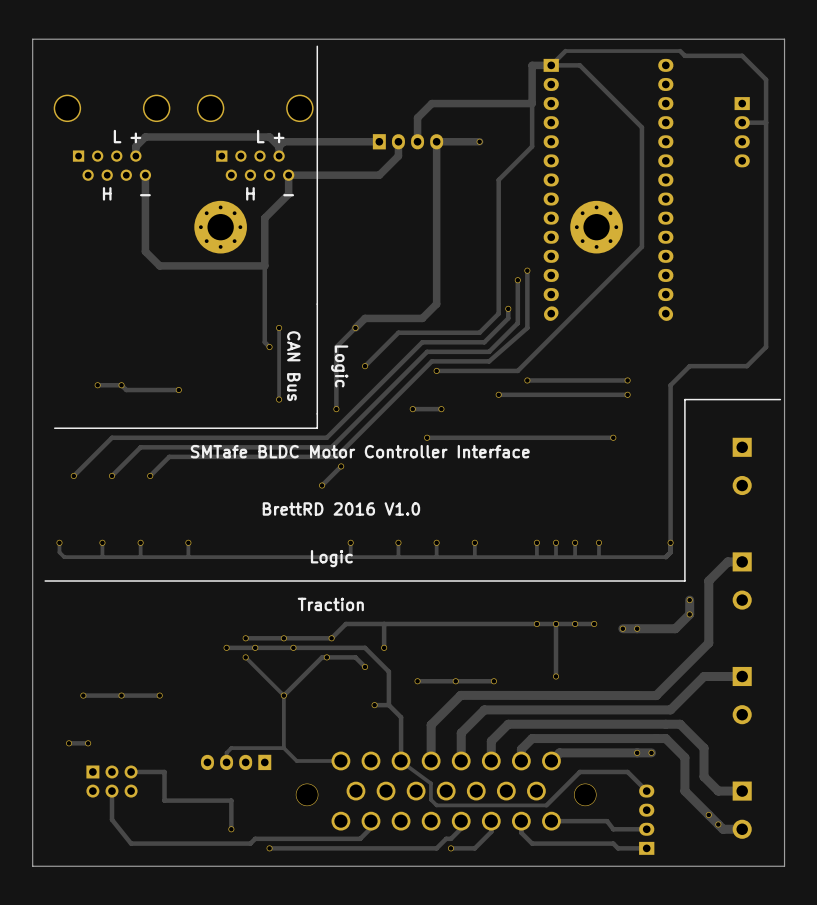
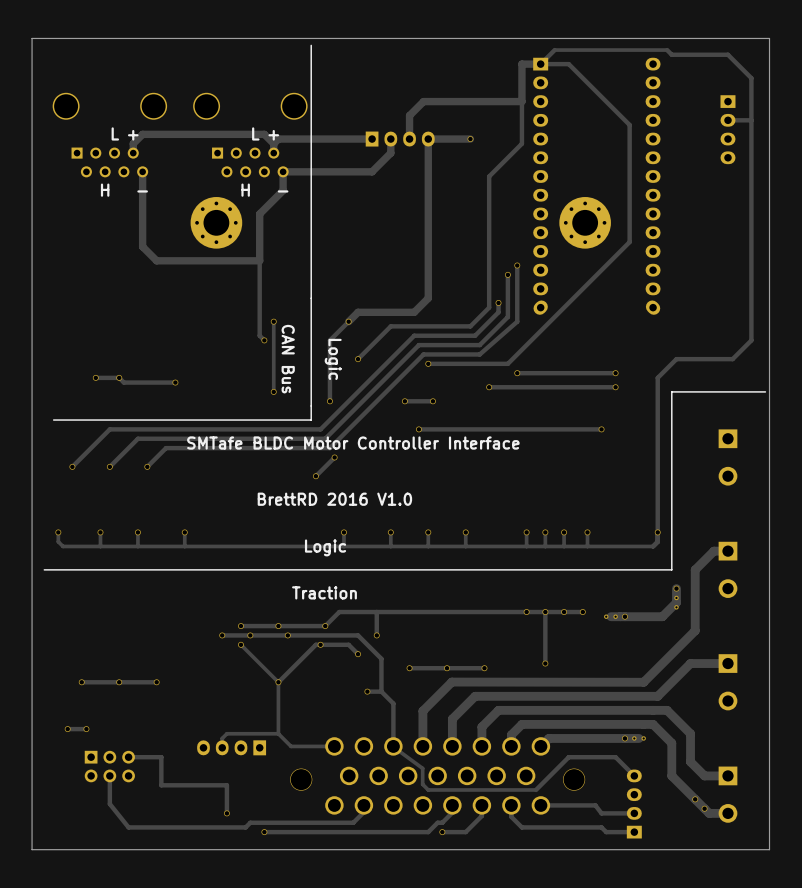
via: none -> (676, 597)
via: (689, 614) -> none
via: none -> (676, 607)
via: none -> (606, 616)
via: (622, 628) -> none
via: none -> (615, 616)
via: none -> (634, 738)
via: (651, 752) -> none
via: none -> (643, 738)

